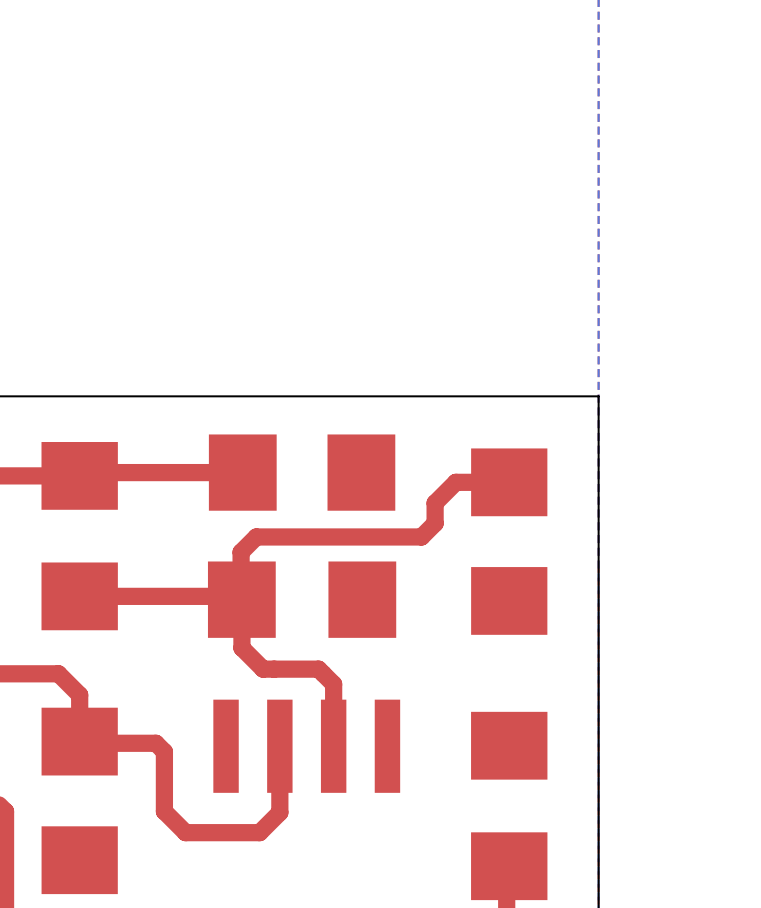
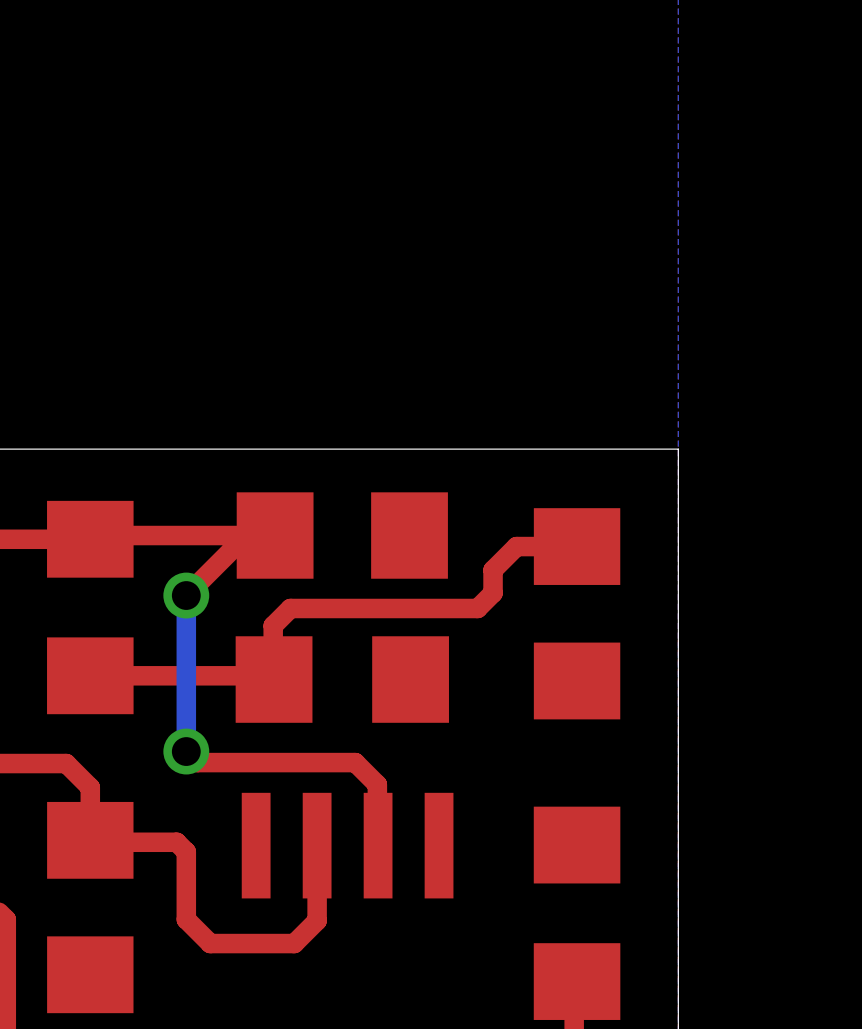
top track: none -> (246, 535) (186, 595)
bottom track: none -> (186, 595) (186, 751)
via: none -> (186, 595)
top track: (241, 599) (241, 647) (263, 669) (318, 669) (333, 684) (333, 746) -> (186, 751) (197, 762) (355, 762) (377, 784) (378, 845)
via: none -> (186, 751)

